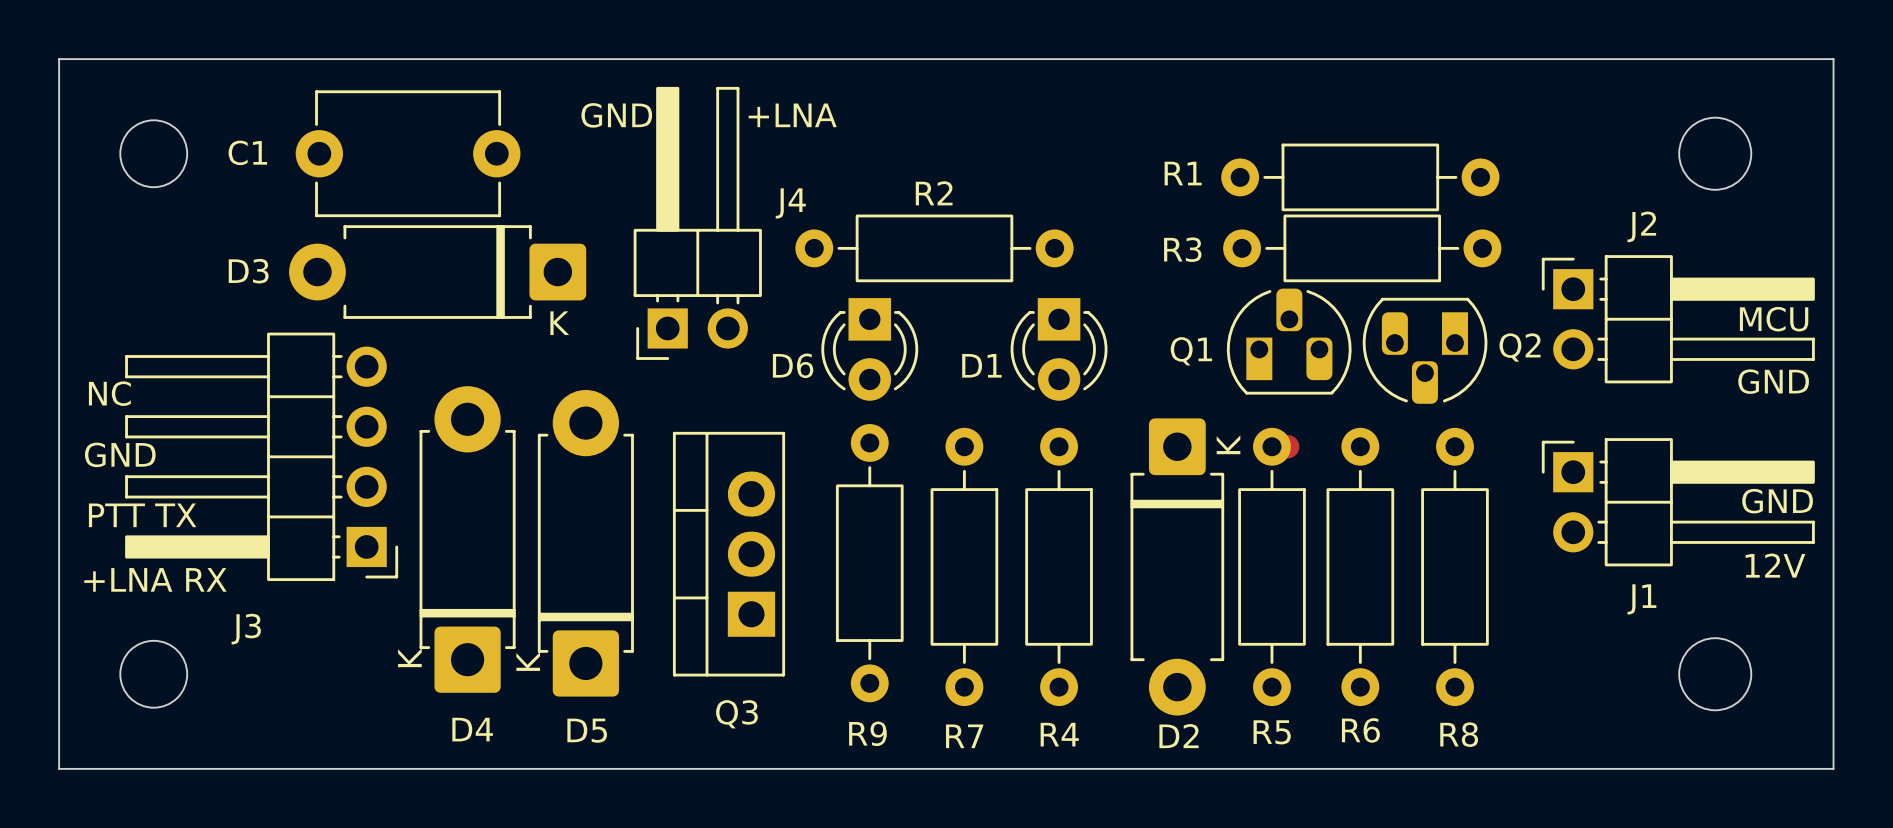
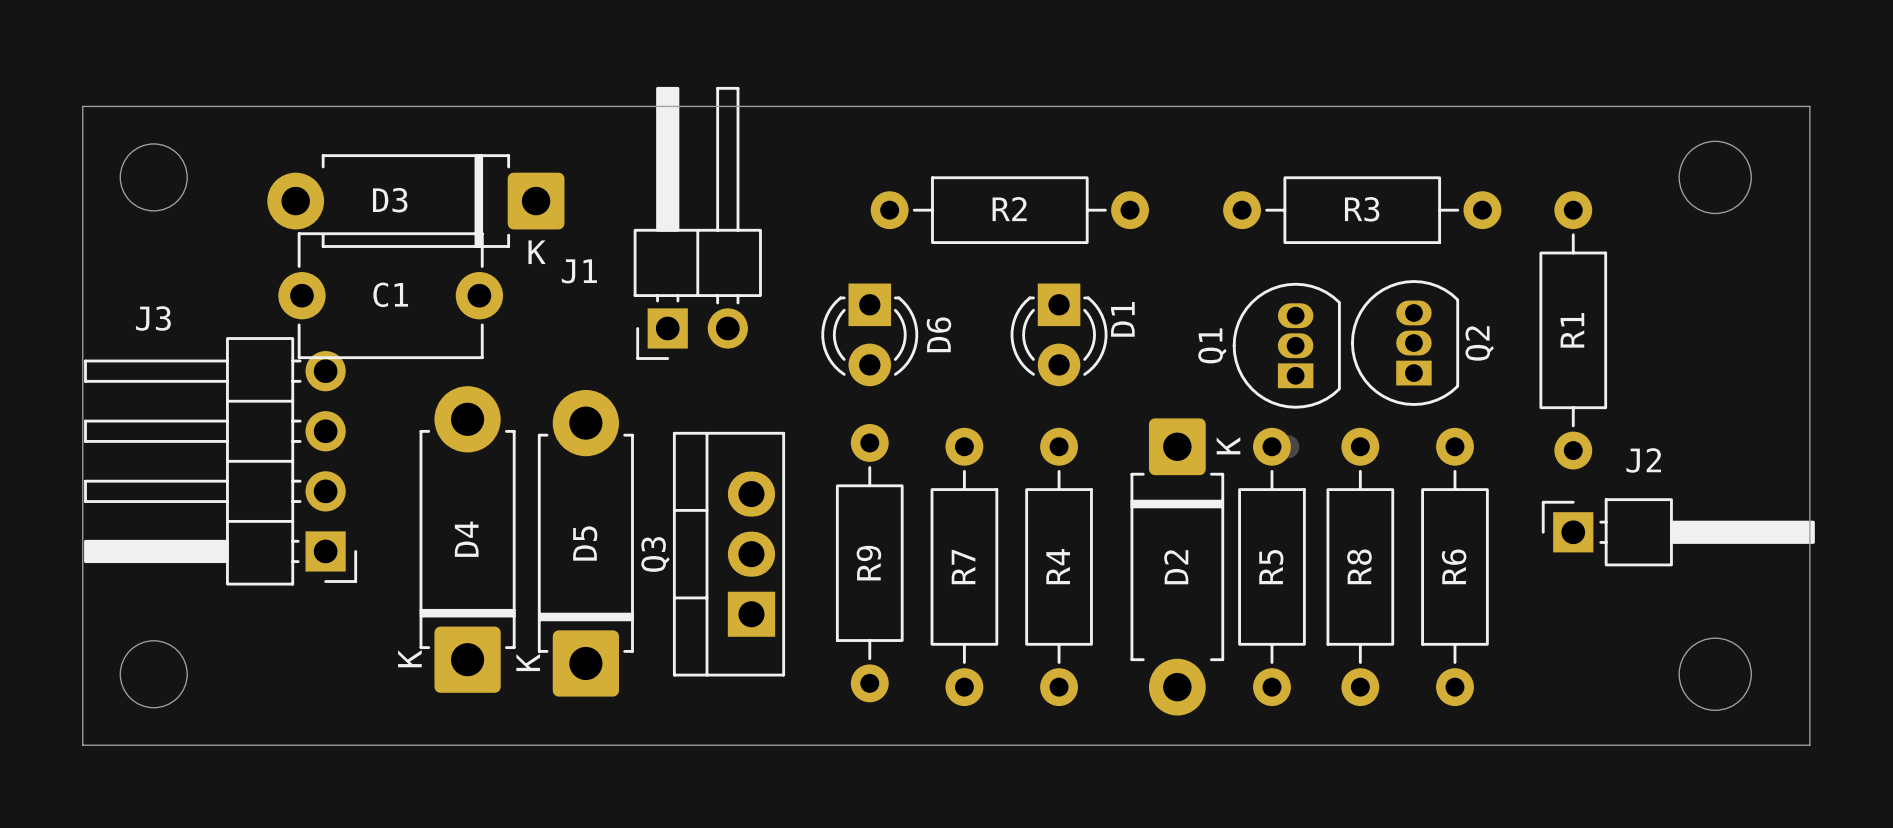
board edge: (59, 59) (1833, 59) (1833, 768) (59, 768) (59, 59) -> (82, 106) (82, 745) (1809, 745) (1809, 106) (82, 106)
text: GND (616, 115) -> none
text: +LNA (792, 115) -> none
C1 name position: C1 (247, 152) -> C1 (390, 294)
round board edge position: (153, 153) -> (153, 177)
C1 position: (408, 153) -> (390, 295)
round board edge position: (1715, 153) -> (1715, 177)
R1 name position: R1 (1183, 173) -> R1 (1572, 330)
R1 rotation: 0° (1360, 177) -> 90° clockwise (1573, 330)
R1 position: (1360, 177) -> (1573, 330)
R2 name position: R2 (934, 193) -> R2 (1009, 209)
J4 name: J4 (790, 203) -> J1 (579, 271)
R2 position: (934, 248) -> (1009, 210)
R3 position: (1362, 248) -> (1362, 210)
R3 name position: R3 (1182, 249) -> R3 (1362, 209)
J2 footprint: [1541, 255, 1815, 384] -> [1541, 498, 1815, 567]
D3 name position: D3 (248, 271) -> D3 (390, 200)
D3 position: (437, 272) -> (415, 201)
Q1 footprint: [1226, 288, 1352, 395] -> [1232, 282, 1341, 409]
Q2 footprint: [1362, 297, 1488, 404] -> [1351, 280, 1460, 406]
text: MCU (1774, 319) -> none
D6 position: (869, 349) -> (869, 334)
D1 position: (1059, 349) -> (1059, 334)
D6 name rotation: 0° (793, 365) -> 90° counterclockwise (938, 334)
D6 name position: D6 (793, 365) -> D6 (938, 334)
D1 name rotation: 0° (981, 365) -> 90° counterclockwise (1122, 319)
D1 name position: D1 (981, 365) -> D1 (1122, 319)
text: GND (1773, 381) -> none
text: NC (109, 393) -> none
text: GND (120, 454) -> none
J3 position: (261, 456) -> (220, 461)
text: GND (1777, 501) -> none
J1: (1678, 502) -> none
text: PTT TX (142, 515) -> none
text: 12V (1775, 565) -> none
text: +LNA RX (155, 579) -> none
J3 name position: J3 (246, 629) -> J3 (153, 318)
Q3 name rotation: 0° (736, 714) -> 90° counterclockwise (655, 554)
Q3 name position: Q3 (736, 714) -> Q3 (655, 554)
D4 name rotation: 0° (472, 729) -> 90° counterclockwise (466, 539)
D4 name position: D4 (472, 729) -> D4 (466, 539)
D5 name rotation: 0° (587, 730) -> 90° counterclockwise (585, 543)
D5 name position: D5 (587, 730) -> D5 (585, 543)
R6 name: R6 (1360, 730) -> R8 (1359, 566)
R5 name rotation: 0° (1272, 732) -> 90° counterclockwise (1271, 567)
R5 name position: R5 (1272, 732) -> R5 (1271, 567)
R9 name rotation: 0° (867, 733) -> 90° counterclockwise (868, 563)
R9 name position: R9 (867, 733) -> R9 (868, 563)
R4 name rotation: 0° (1059, 734) -> 90° counterclockwise (1058, 566)
R4 name position: R4 (1059, 734) -> R4 (1058, 566)
R8 name: R8 (1459, 734) -> R6 (1454, 566)
R7 name rotation: 0° (964, 736) -> 90° counterclockwise (963, 567)
R7 name position: R7 (964, 736) -> R7 (963, 567)
D2 name rotation: 0° (1179, 736) -> 90° counterclockwise (1176, 567)
D2 name position: D2 (1179, 736) -> D2 (1176, 567)

